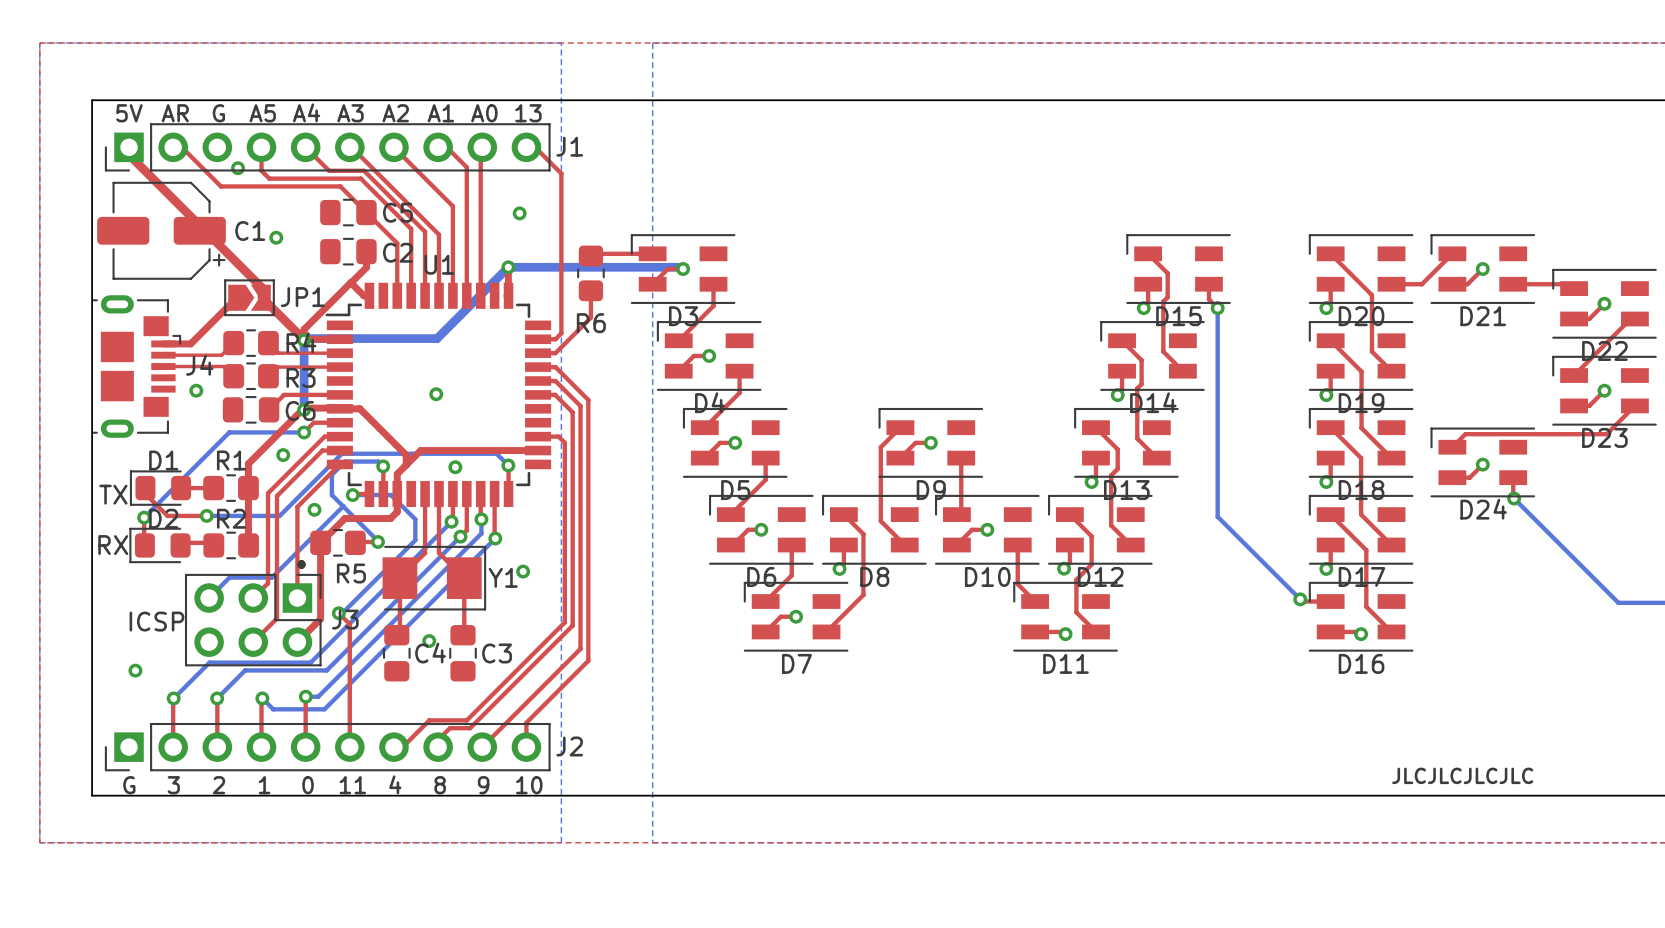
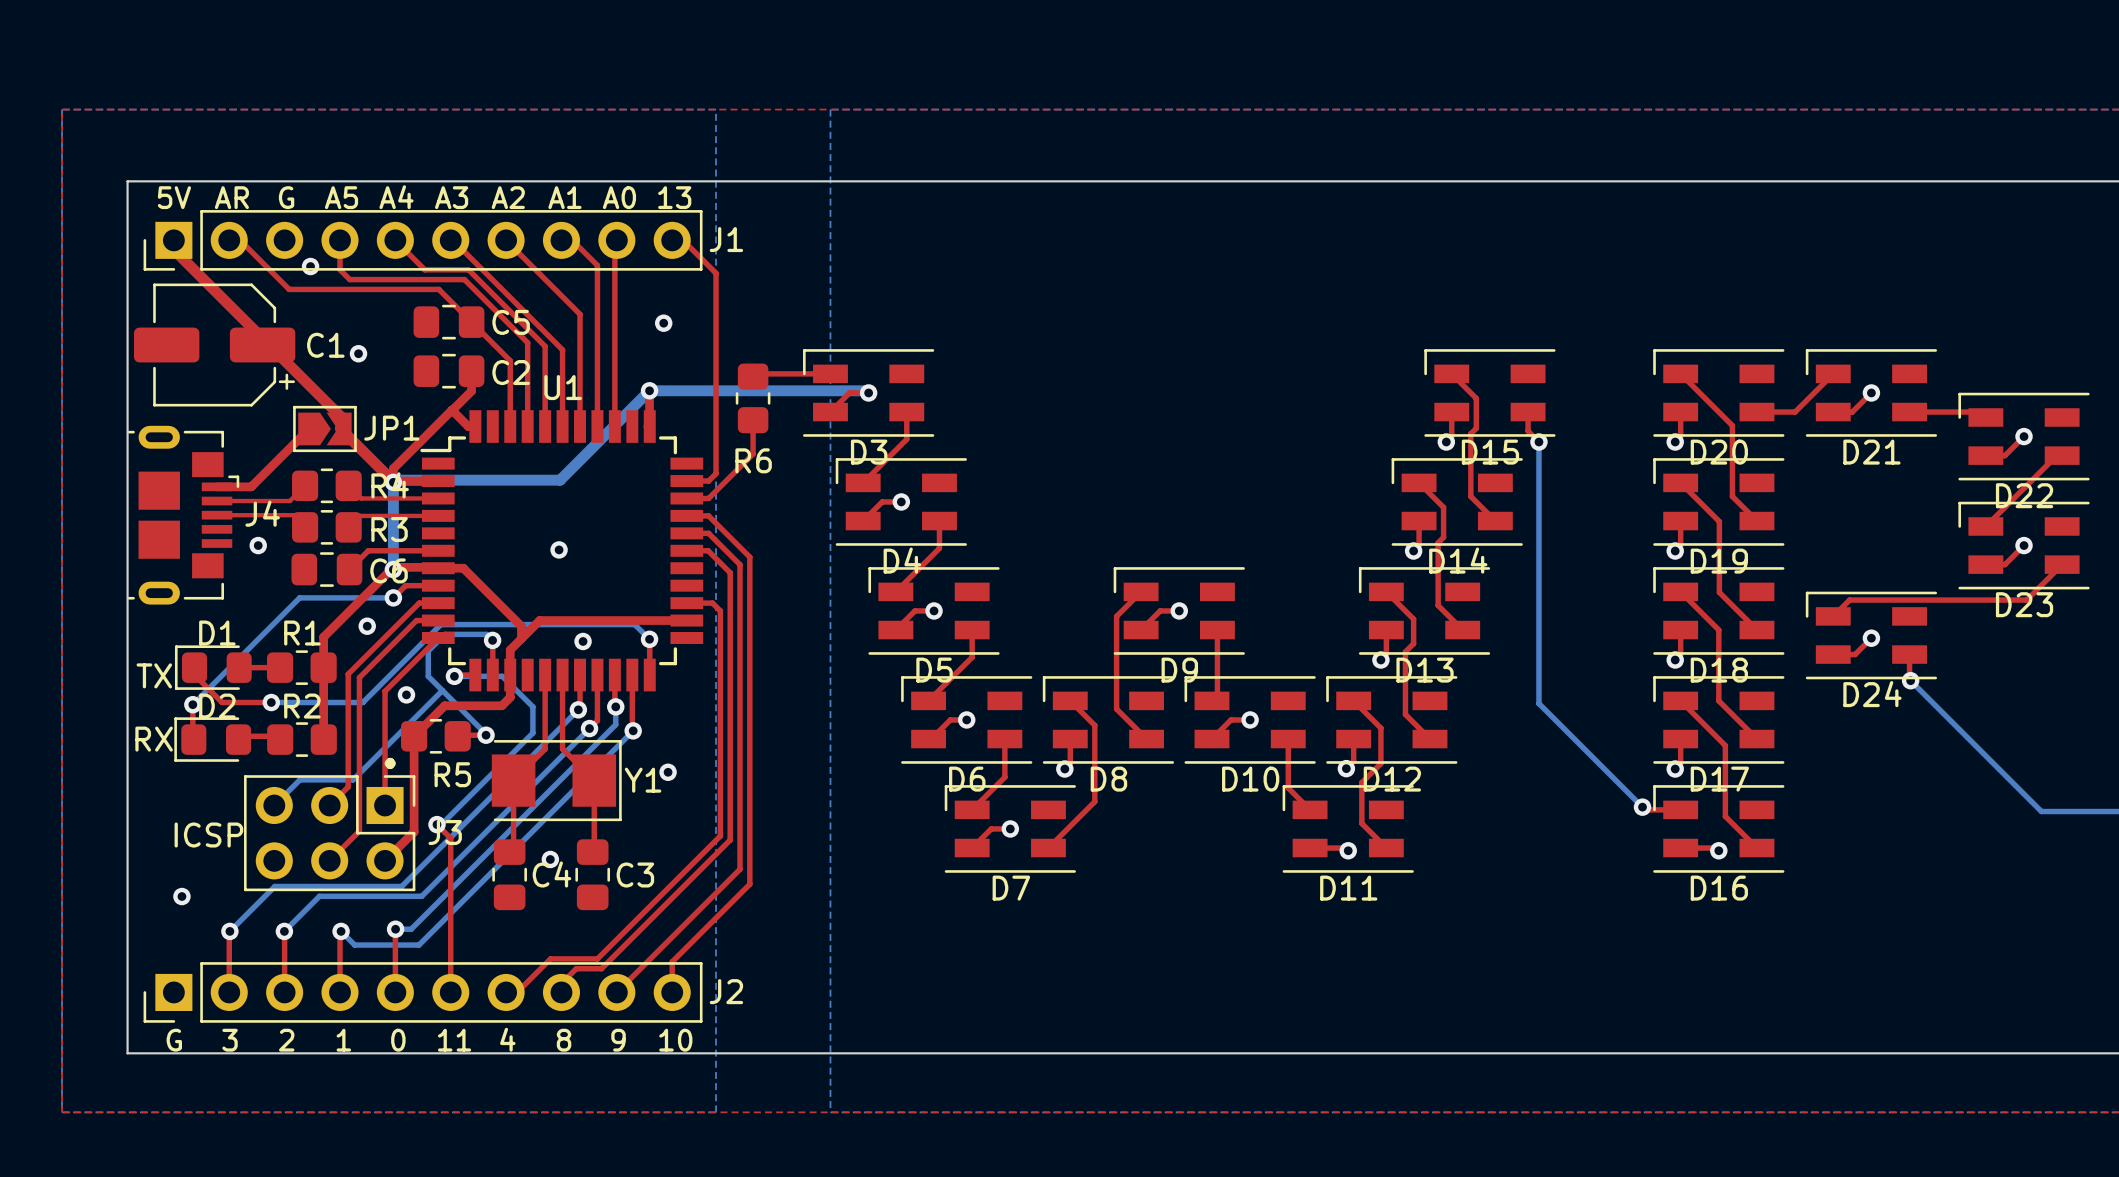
text: JLCJLCJLCJLC (1462, 775) -> none

